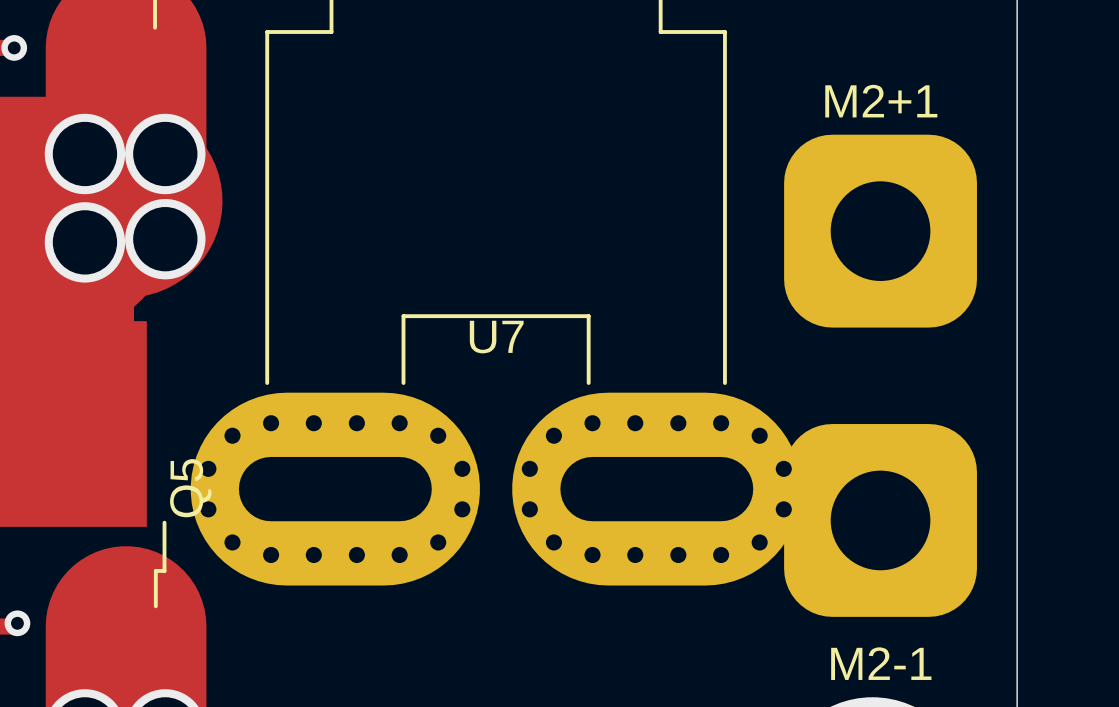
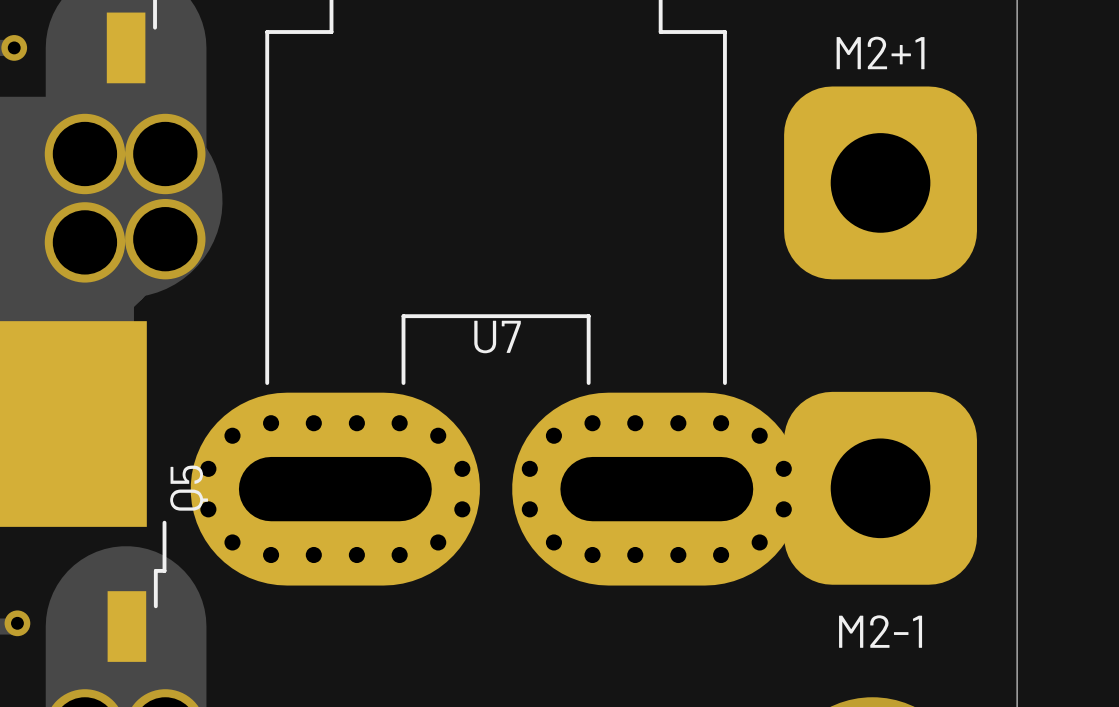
M2+1 position: (880, 231) -> (880, 182)
M2-1 position: (880, 520) -> (880, 488)

